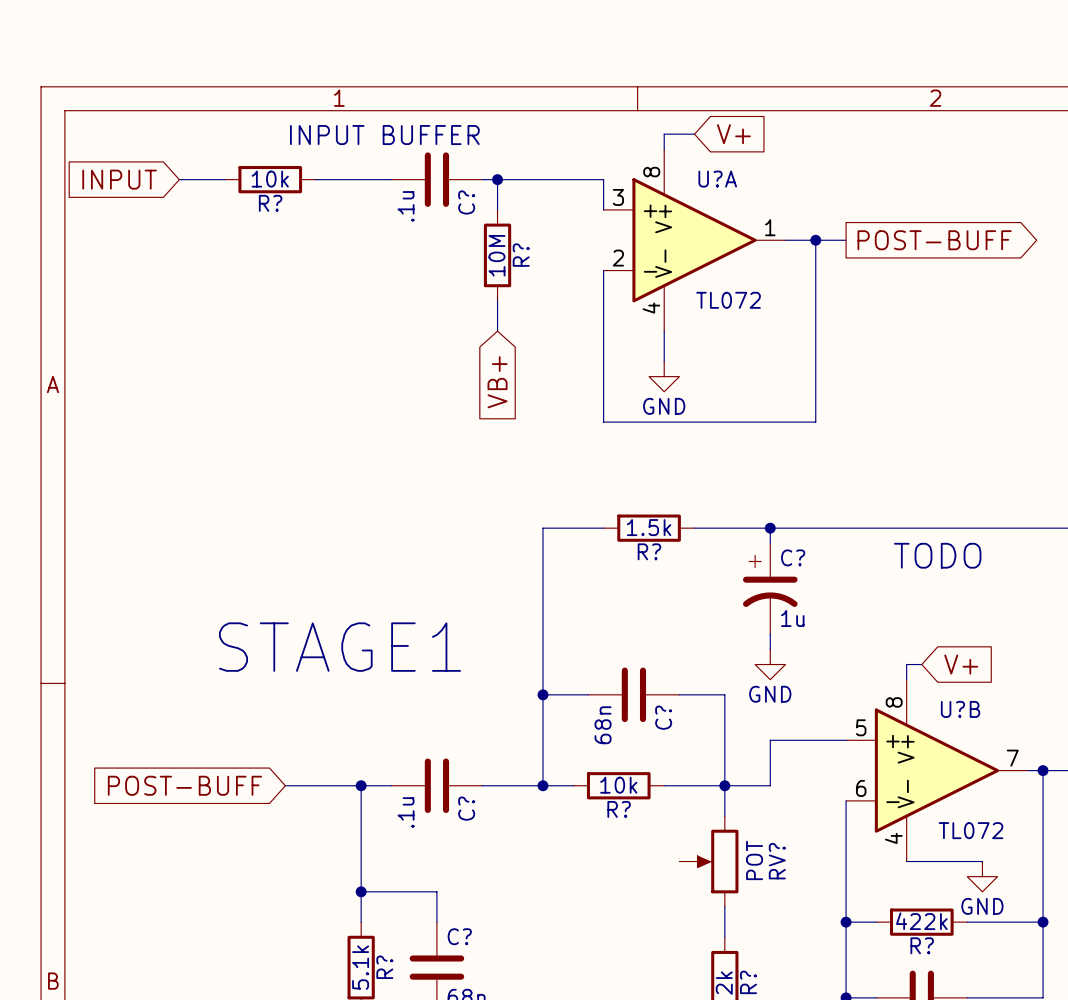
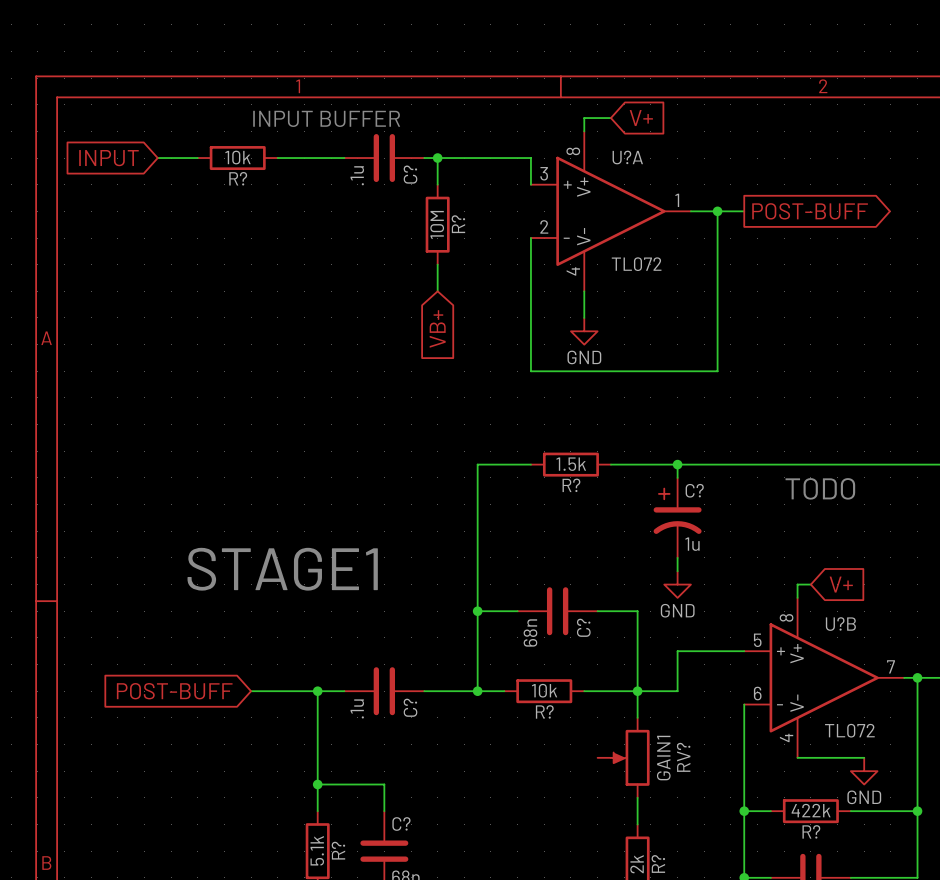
RV? value: POT (754, 860) -> GAIN1 (663, 758)

